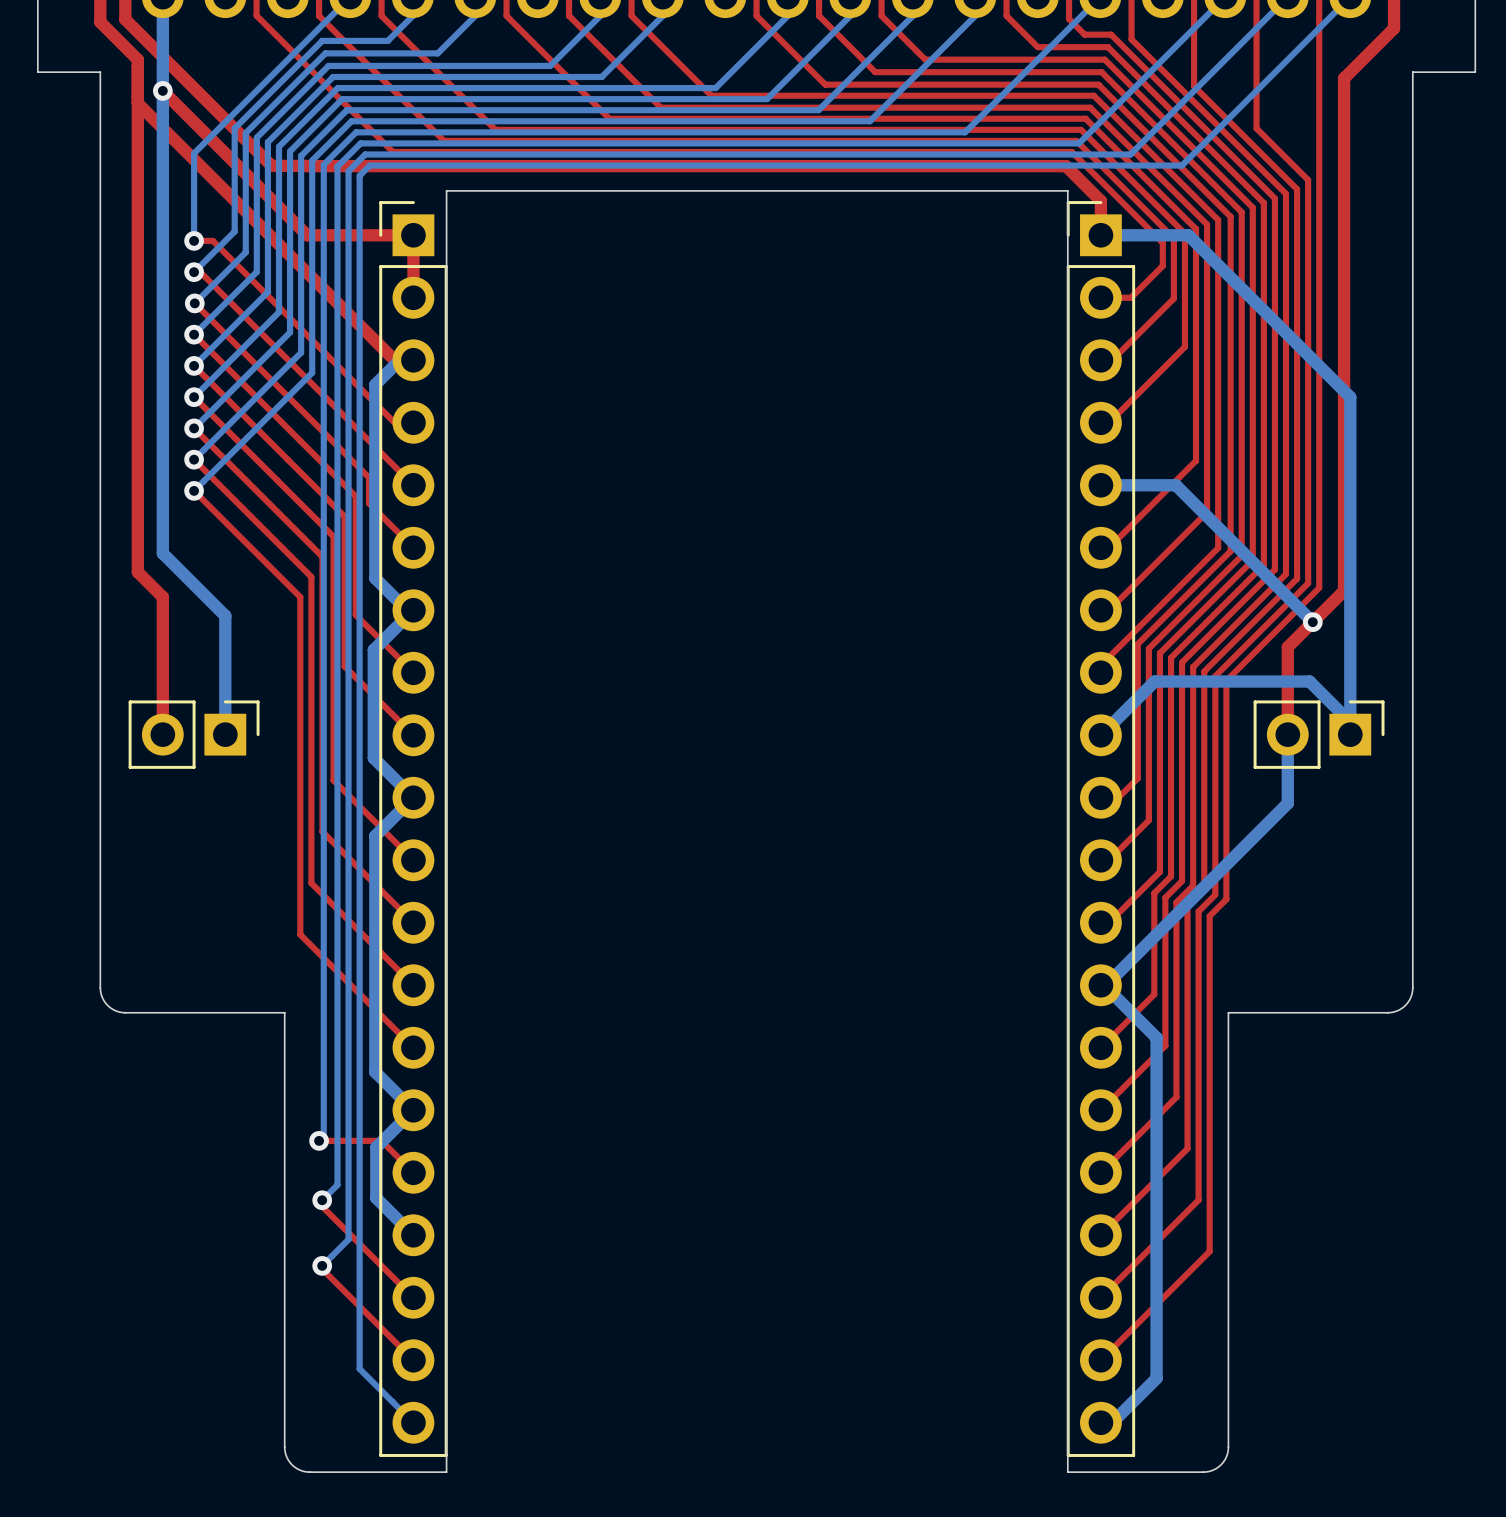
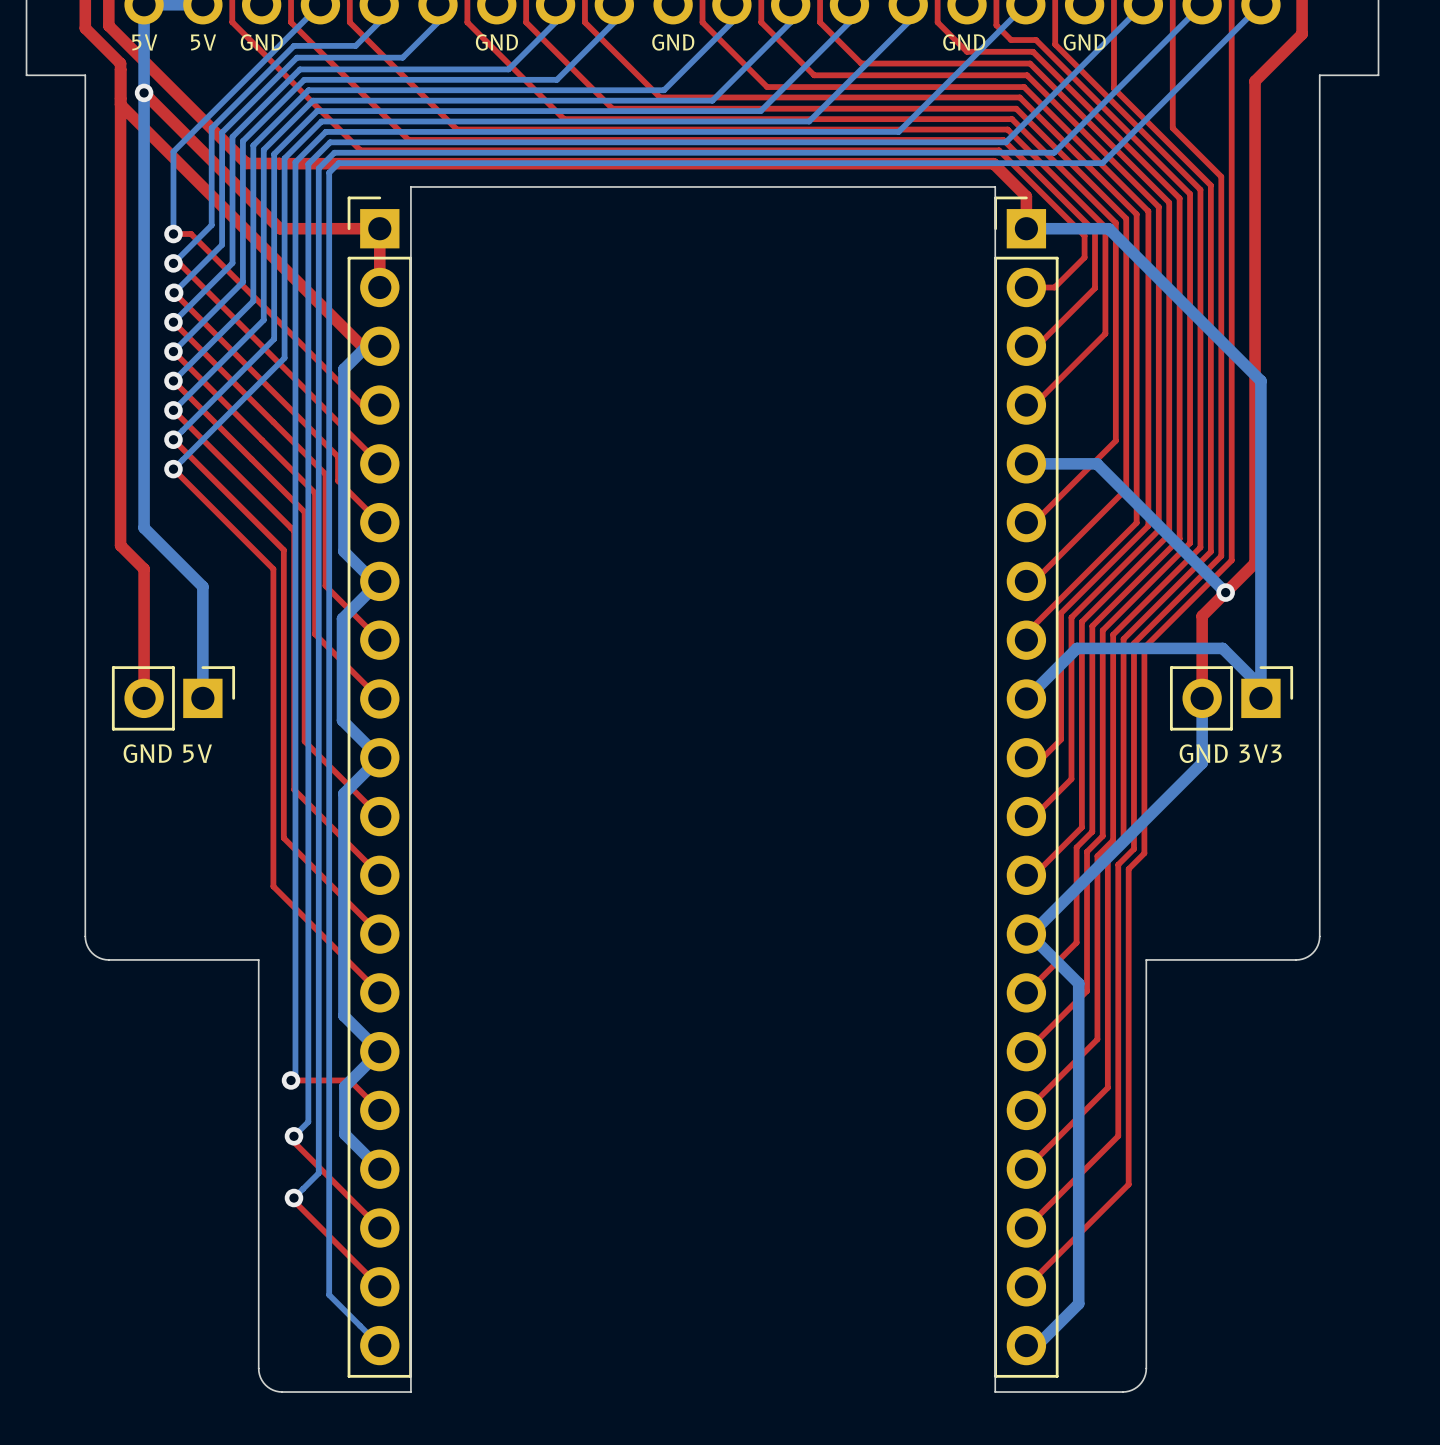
text: none -> 5V (144, 42)
text: none -> 5V (203, 42)
text: none -> GND (261, 42)
text: none -> GND (496, 42)
text: none -> GND (673, 42)
text: none -> GND (964, 42)
text: none -> GND (1084, 42)
text: none -> GND 5V (167, 753)
text: none -> GND 3V3 (1230, 753)

